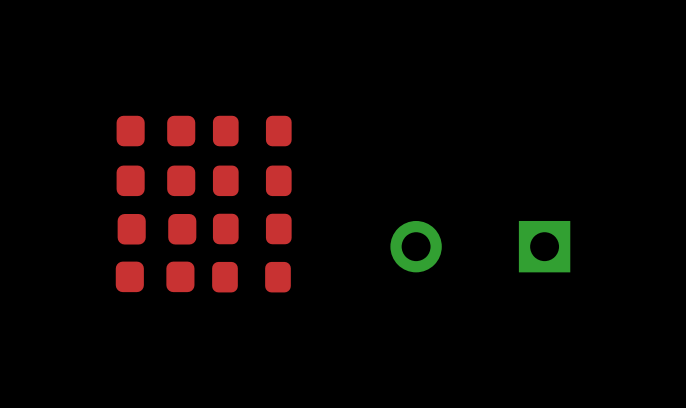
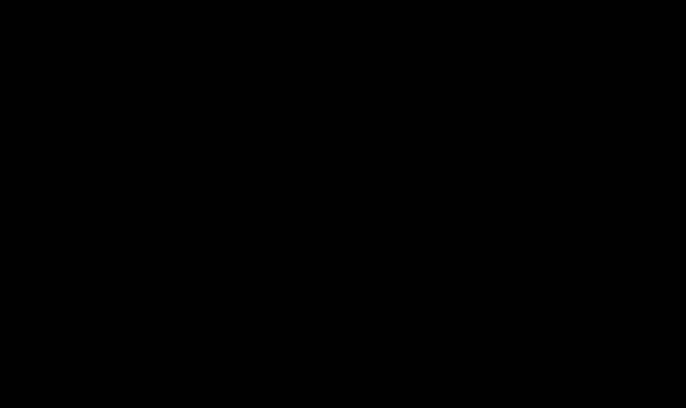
part: (155, 131) -> none
part: (252, 131) -> none
part: (155, 180) -> none
part: (252, 180) -> none
part: (156, 229) -> none
part: (252, 229) -> none
part: (480, 246) -> none
part: (155, 276) -> none
part: (251, 277) -> none

